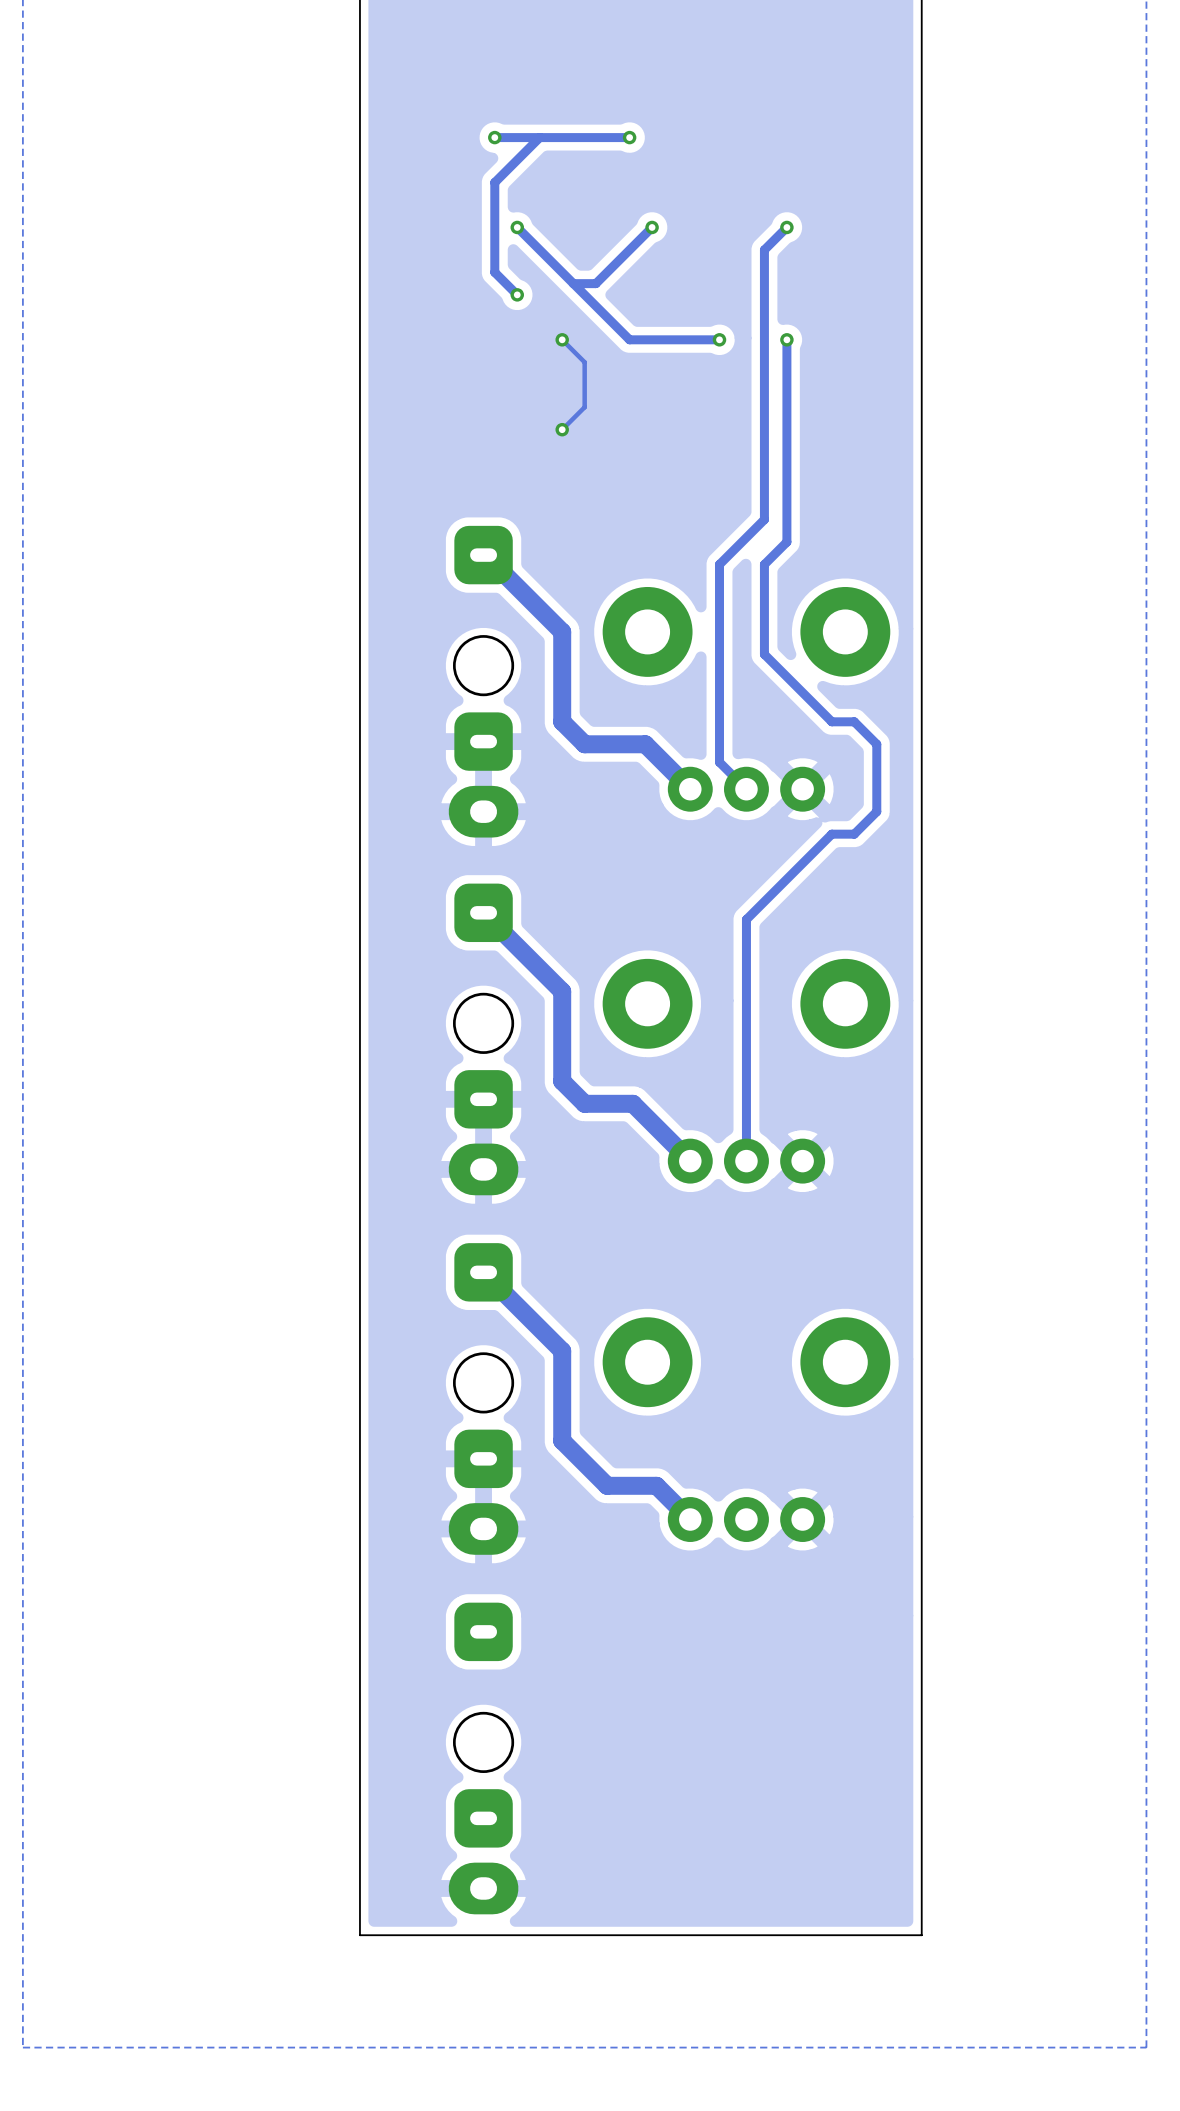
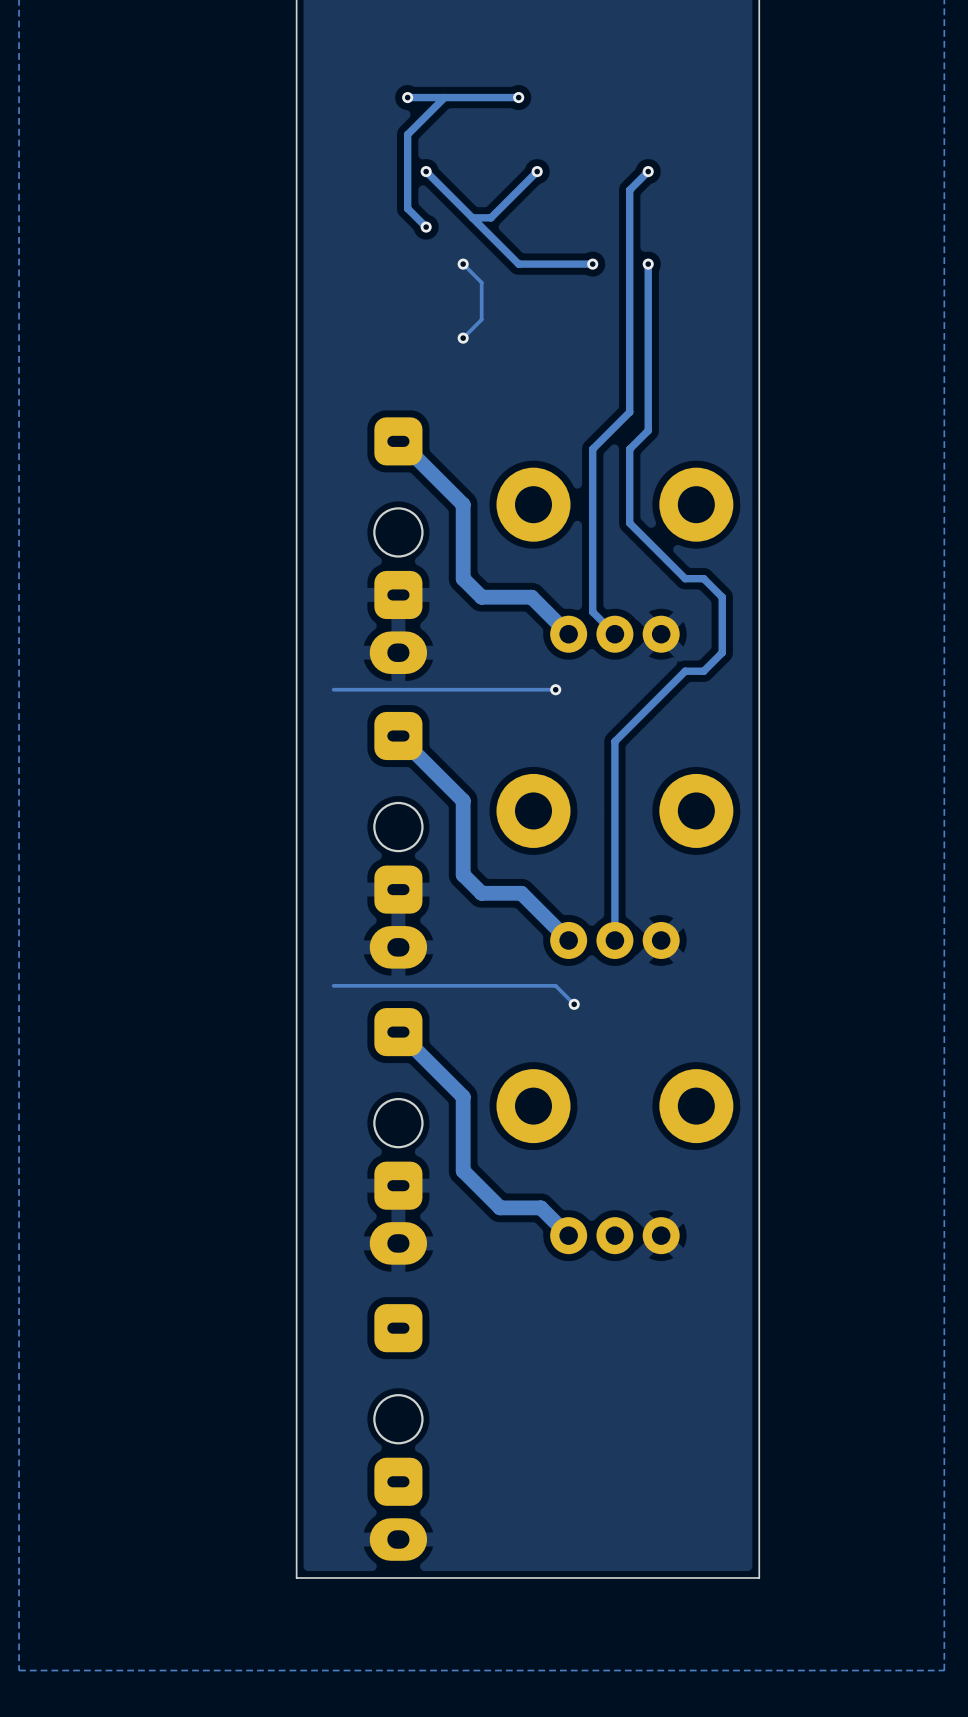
track: none -> (555, 689) (333, 689)
via: none -> (555, 689)
track: none -> (333, 985) (555, 985) (574, 1004)
via: none -> (574, 1004)

